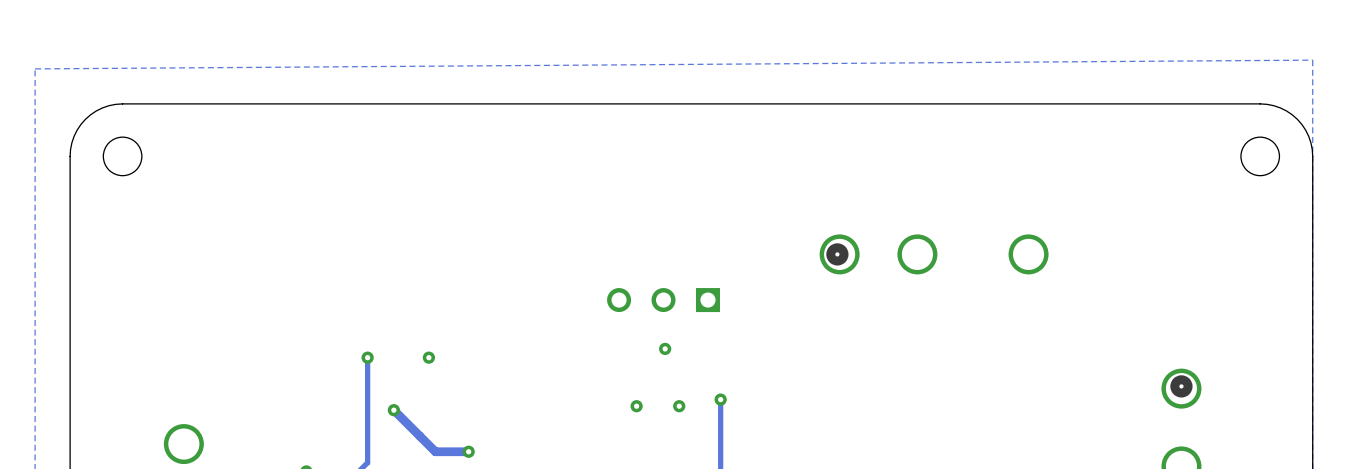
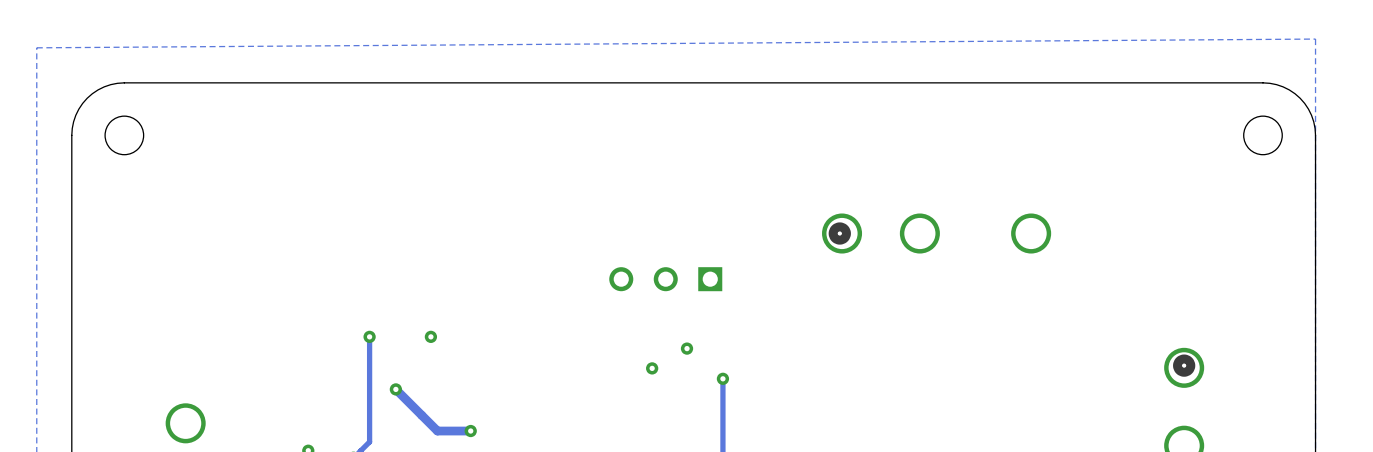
via: (665, 348) -> none
via: none -> (687, 348)
via: none -> (652, 368)
via: (636, 406) -> none
via: (679, 406) -> none

